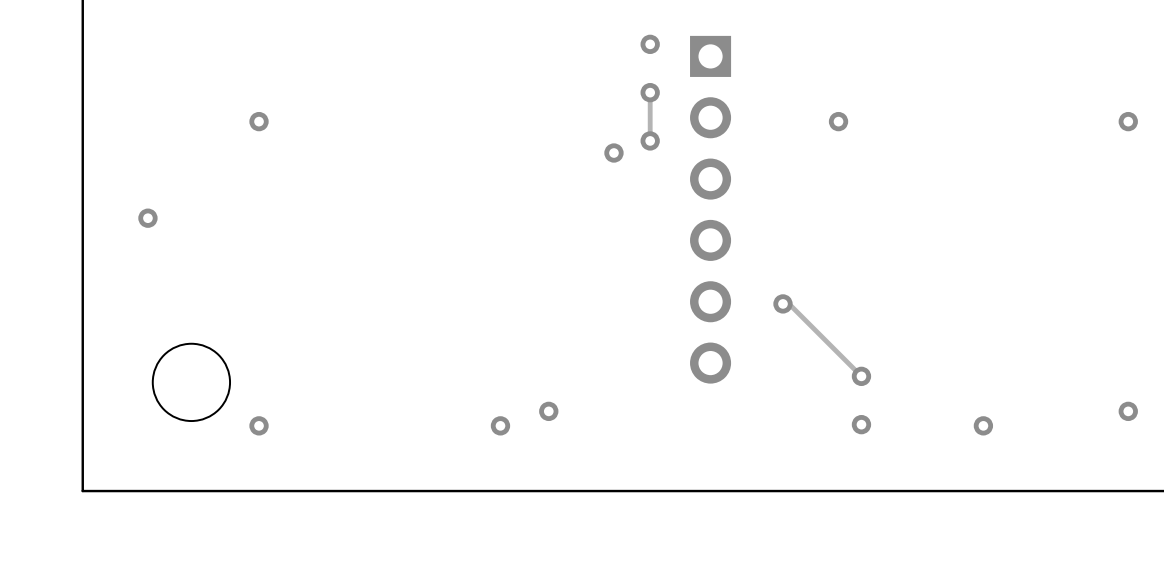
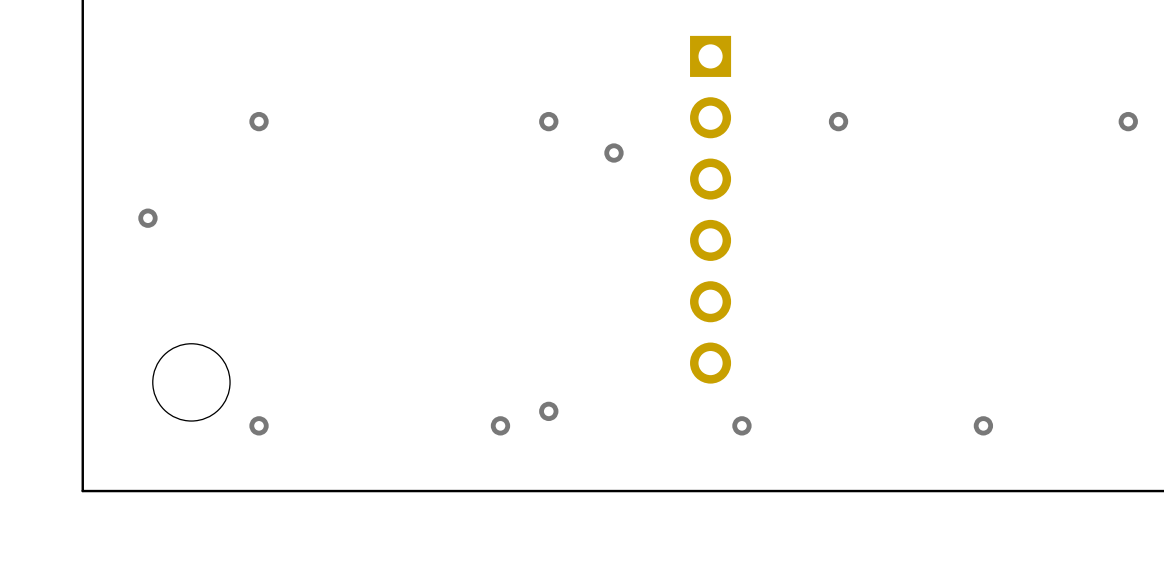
via: (650, 44) -> none
track: (650, 92) (650, 140) -> none
via: (650, 92) -> none
via: none -> (548, 121)
via: (650, 140) -> none
track: (782, 303) (789, 303) (861, 376) -> none
via: (782, 303) -> none
via: (861, 376) -> none
via: (1128, 411) -> none
via: (861, 424) -> none
via: none -> (741, 425)

